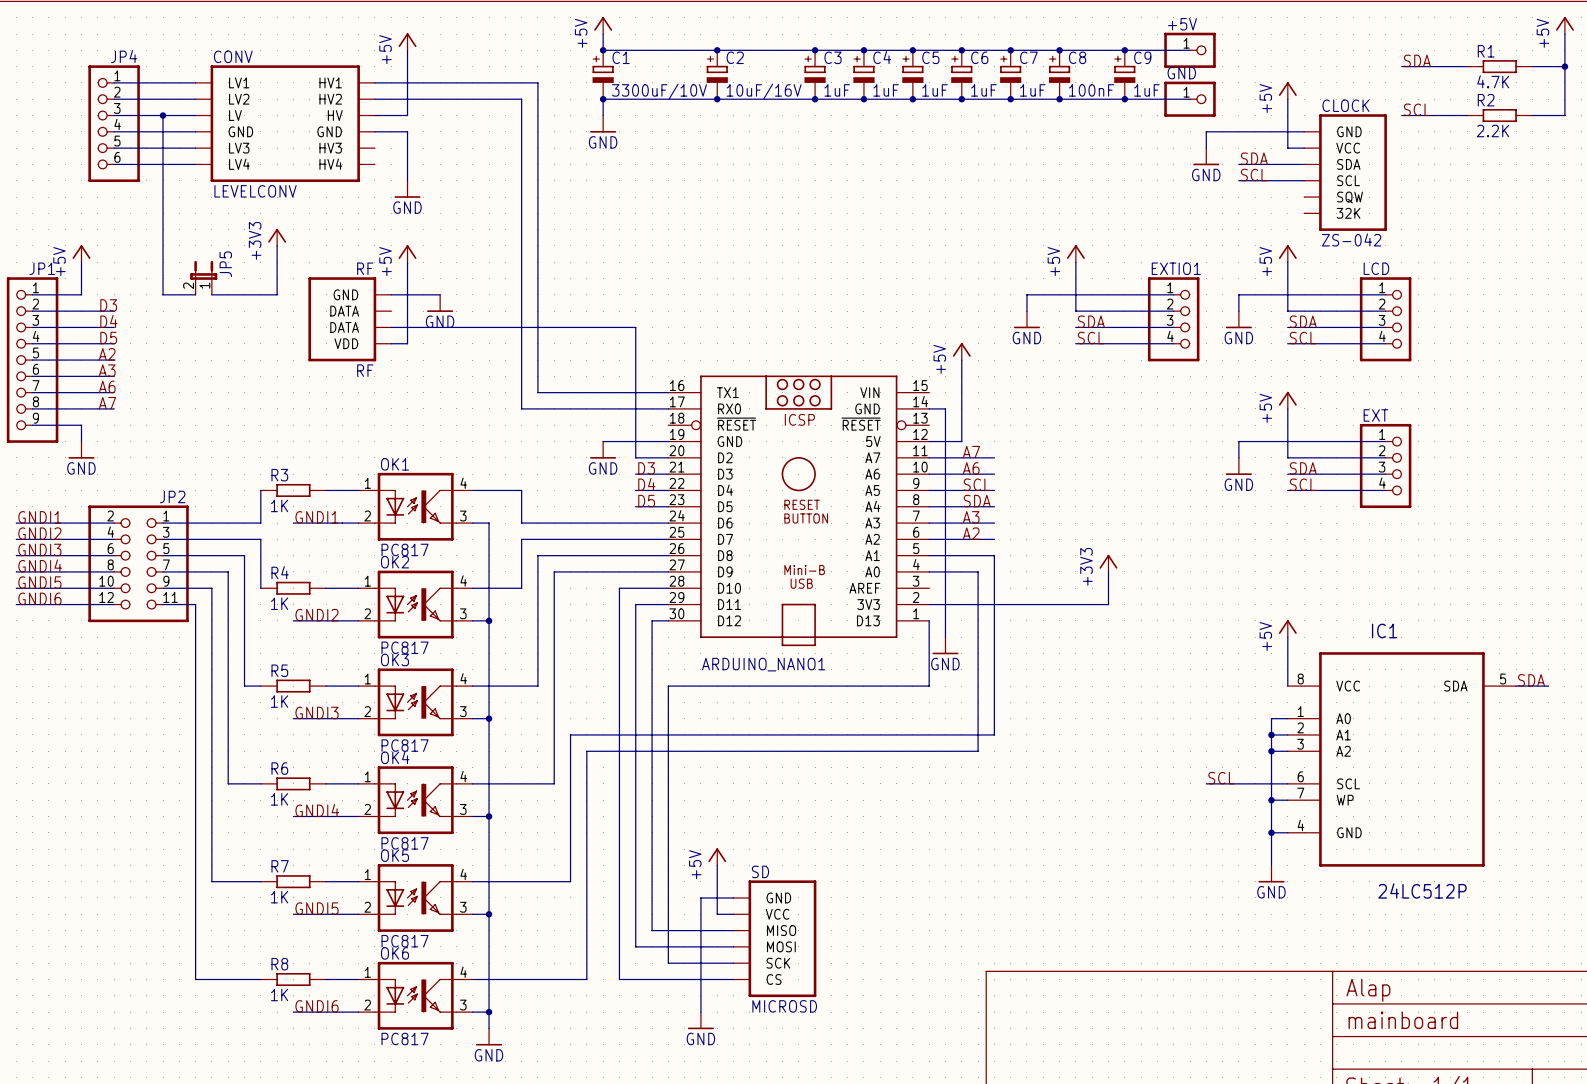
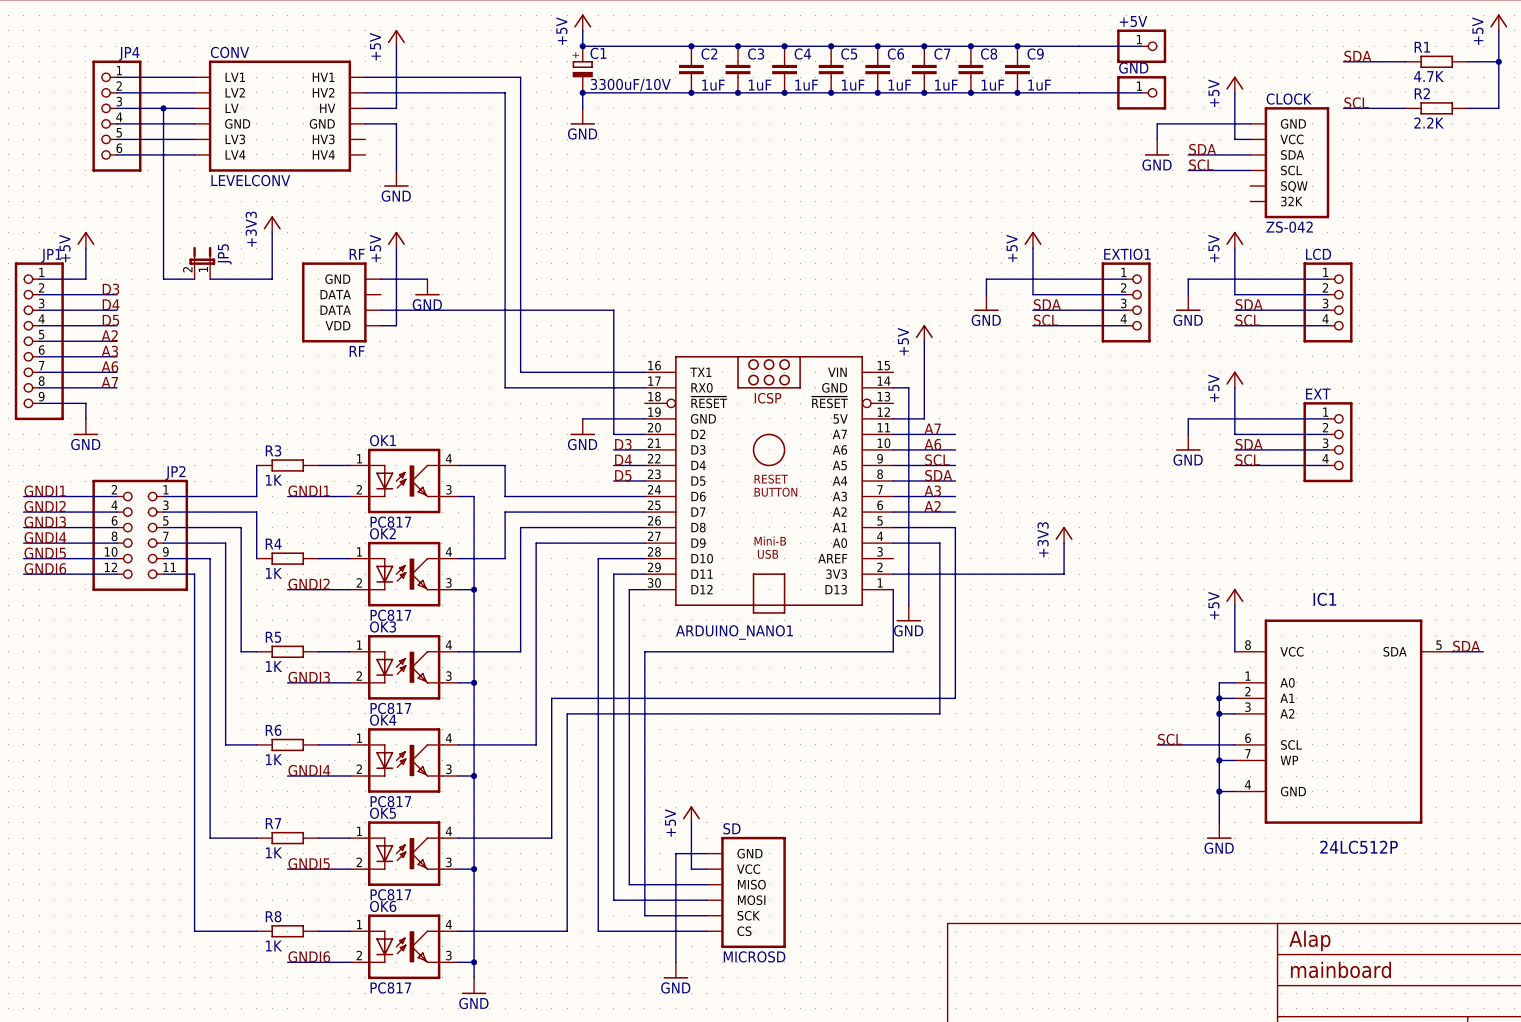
C2 symbol: [706, 50, 728, 100] -> [678, 46, 704, 93]
junction: none -> (737, 46)
C3 symbol: [804, 50, 826, 100] -> [725, 46, 751, 93]
C4 symbol: [853, 50, 875, 100] -> [772, 46, 797, 93]
C5 symbol: [902, 50, 924, 100] -> [818, 46, 844, 93]
C6 symbol: [951, 50, 973, 100] -> [865, 46, 891, 93]
C7 symbol: [1000, 50, 1022, 100] -> [911, 46, 937, 93]
C8 symbol: [1048, 50, 1071, 100] -> [958, 46, 984, 93]
C9 symbol: [1114, 50, 1136, 100] -> [1005, 46, 1030, 93]
junction: (1124, 50) -> none
C8 value: 100nF (1091, 90) -> 1uF (992, 85)
C2 value: 10uF/16V (764, 91) -> 1uF (713, 85)
junction: none -> (737, 92)
junction: (1124, 99) -> none

